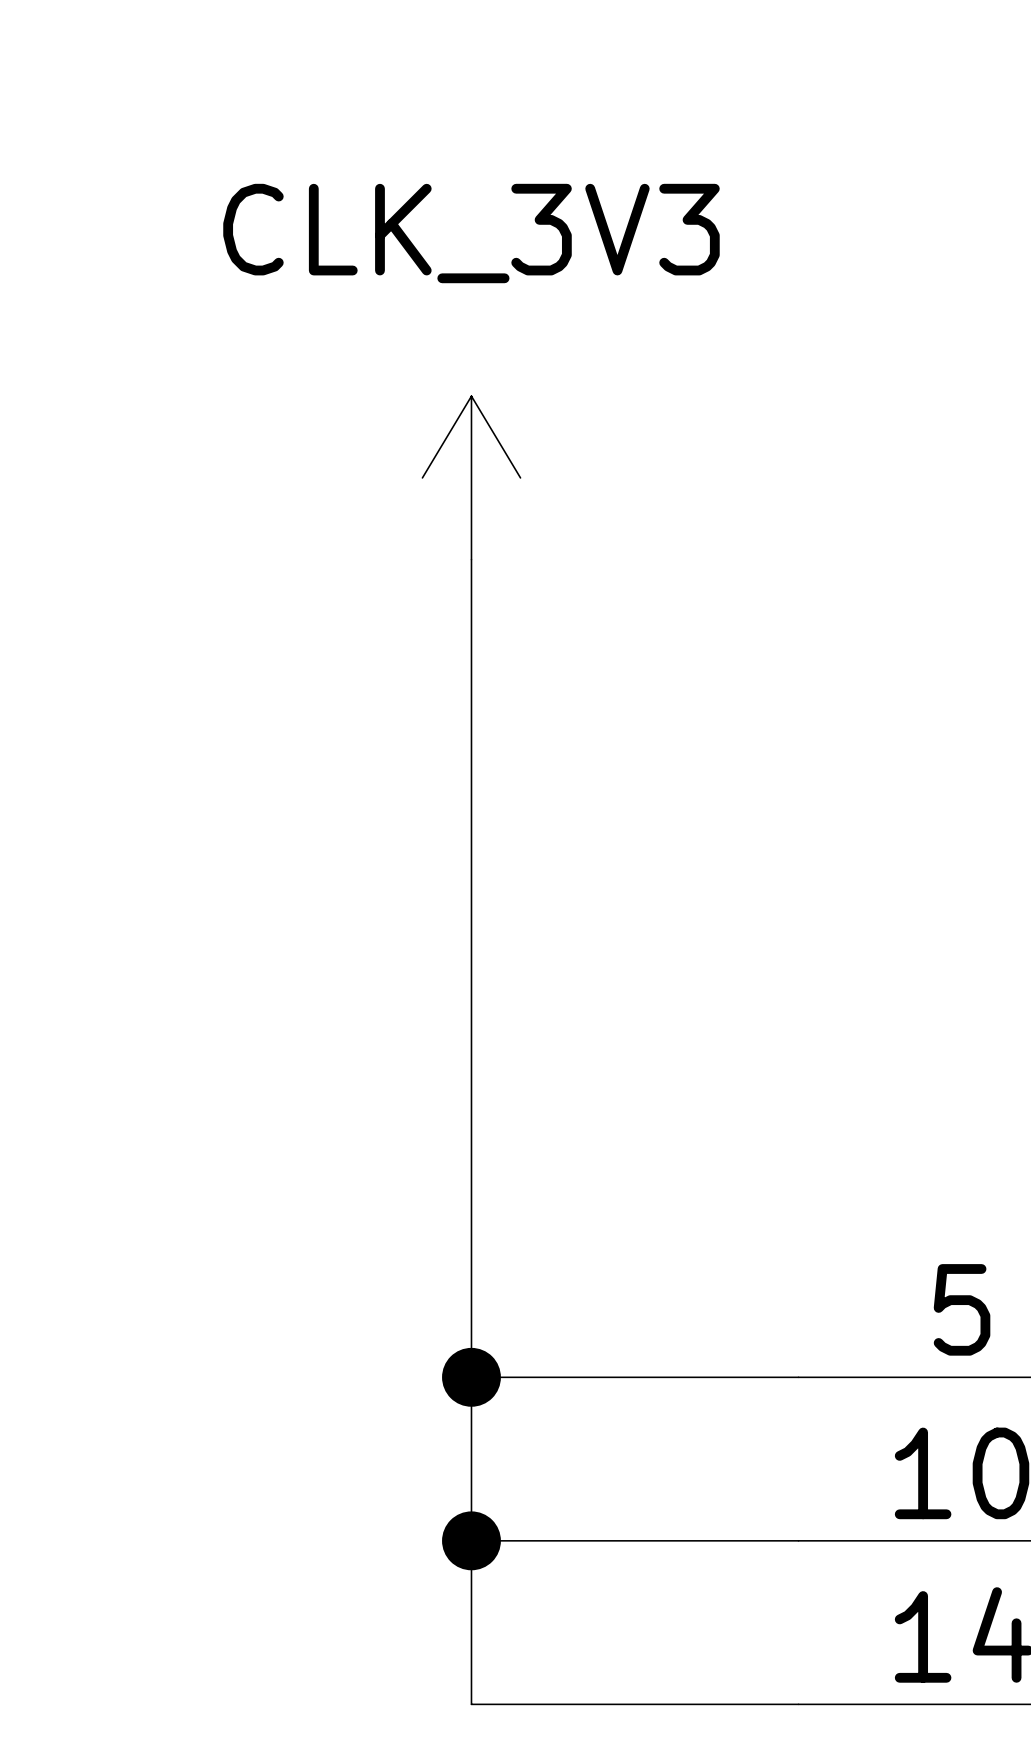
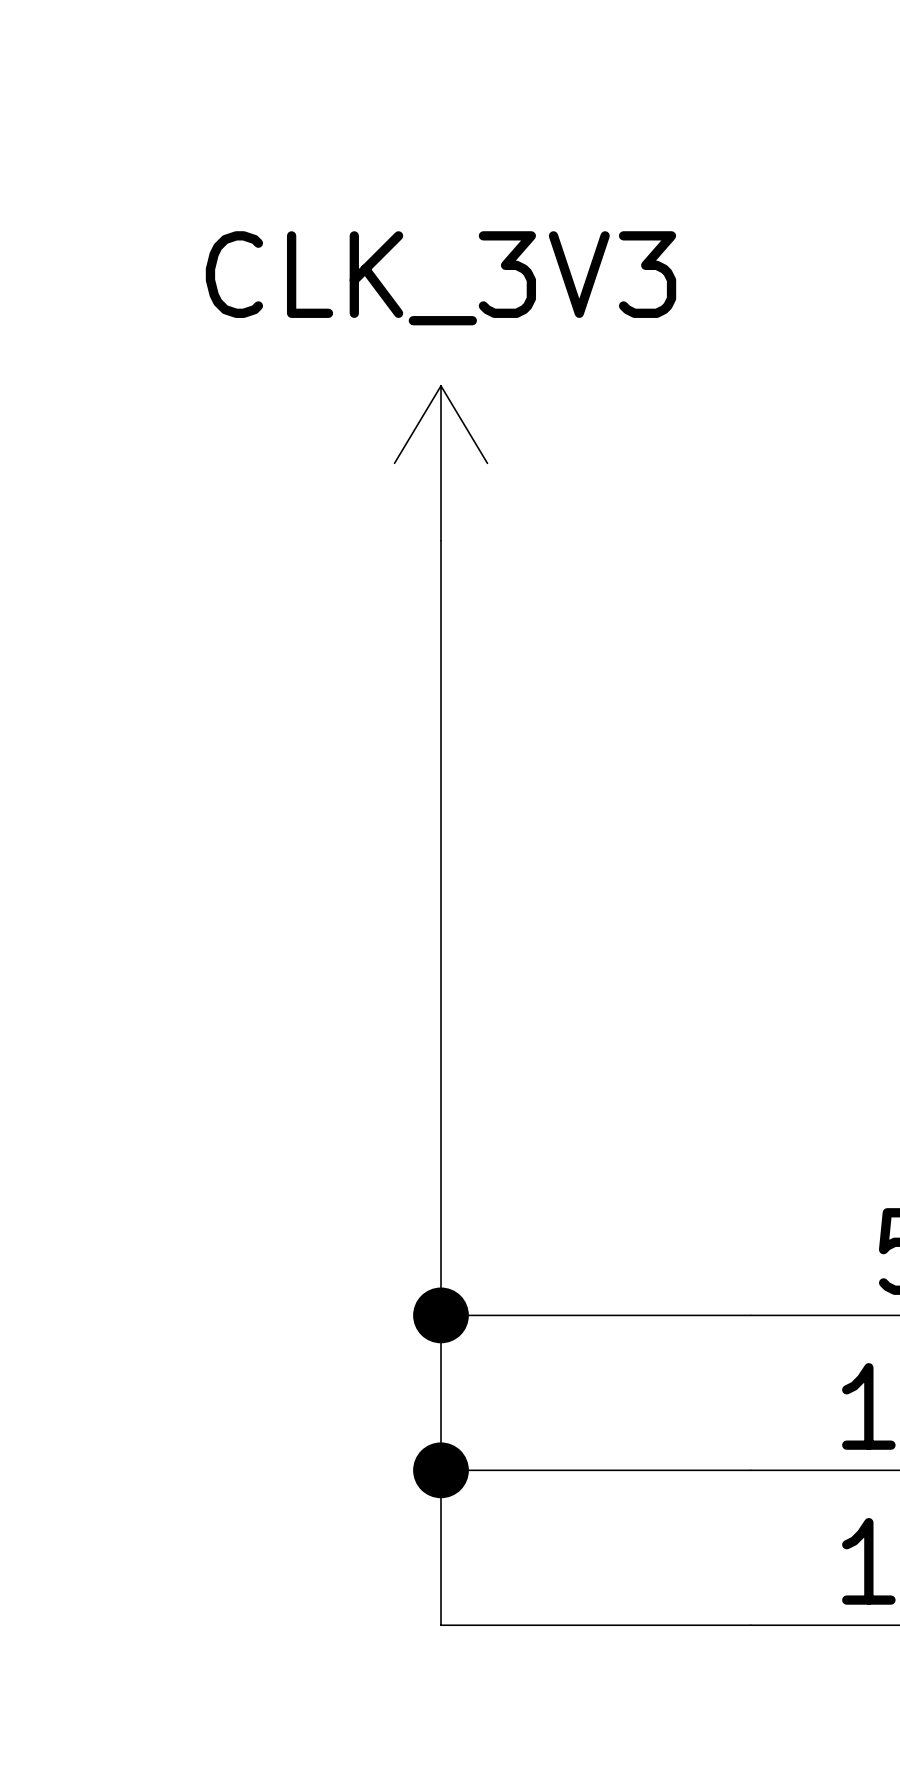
power symbol text position: CLK_3V3 (471, 233) -> CLK_3V3 (441, 278)

